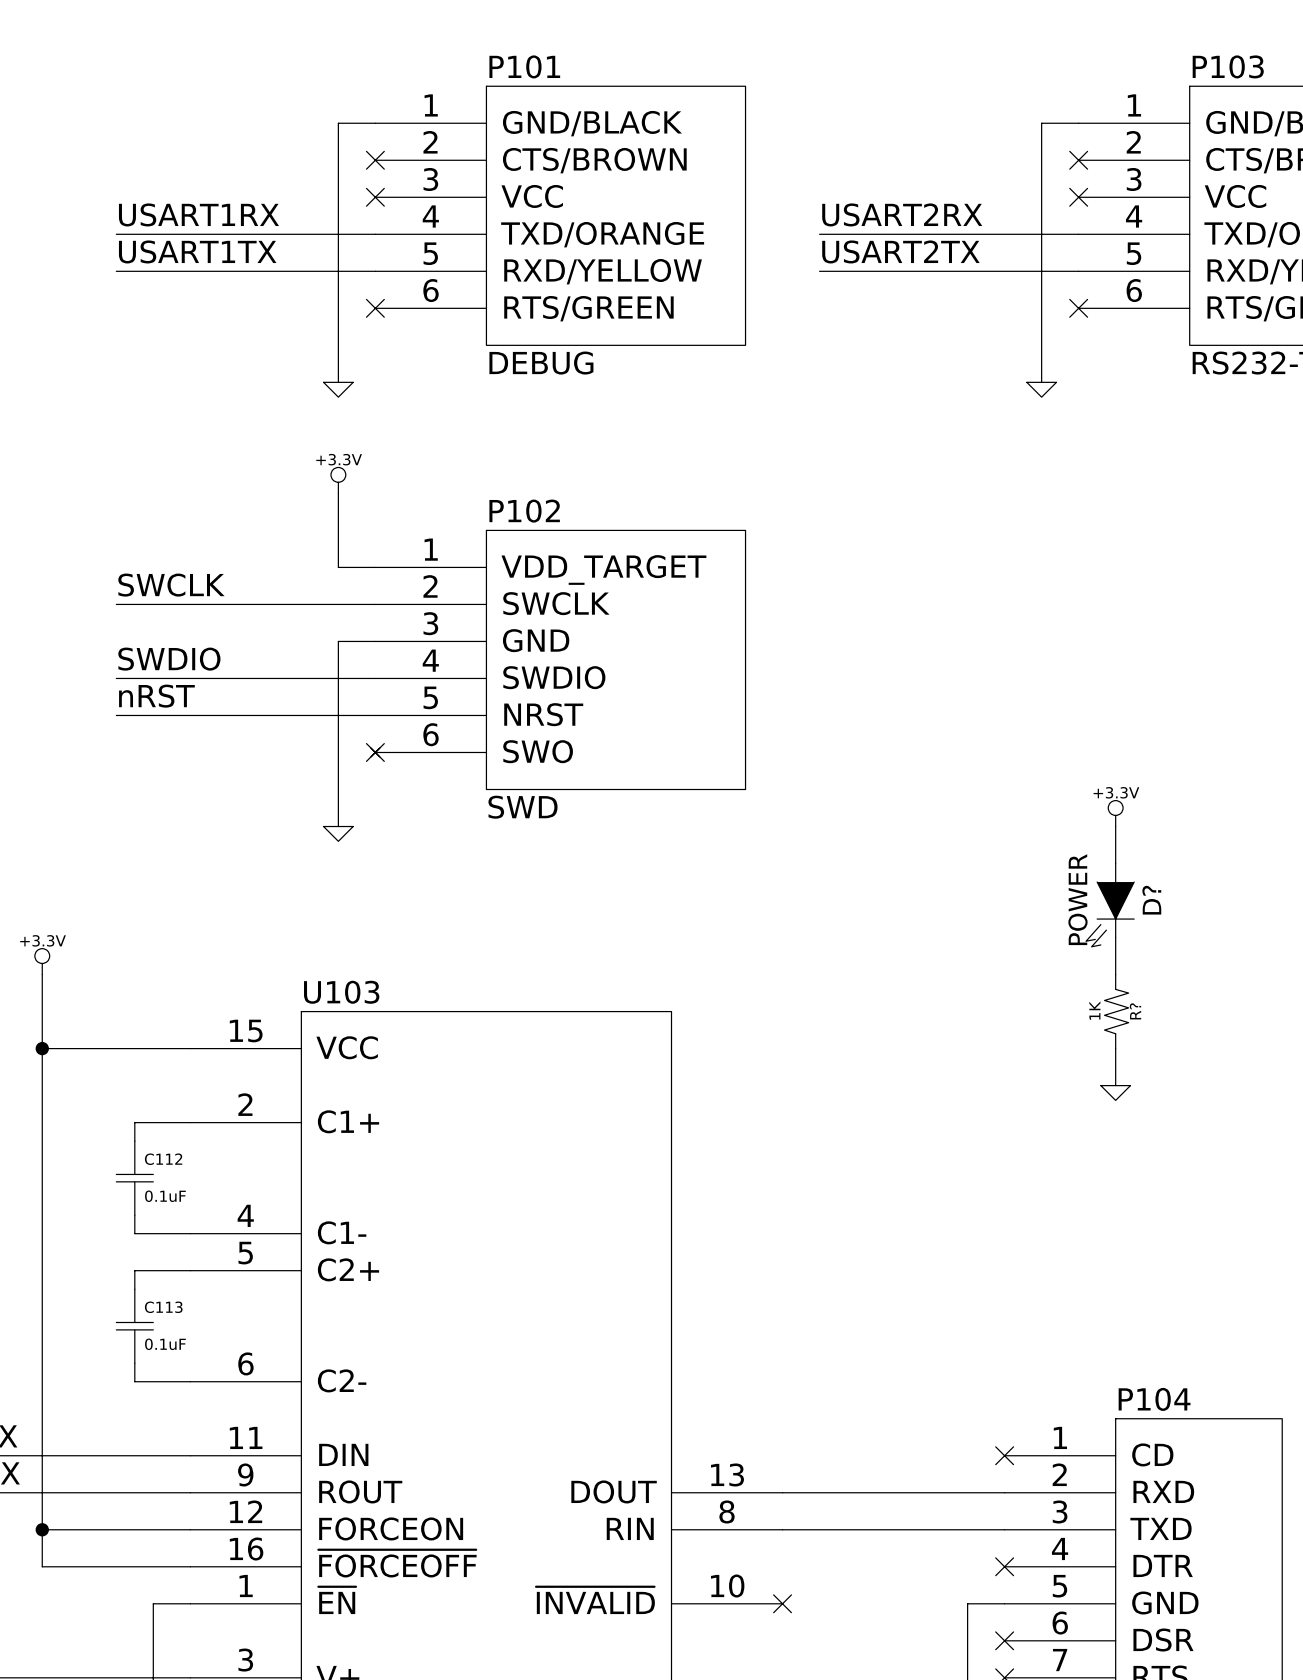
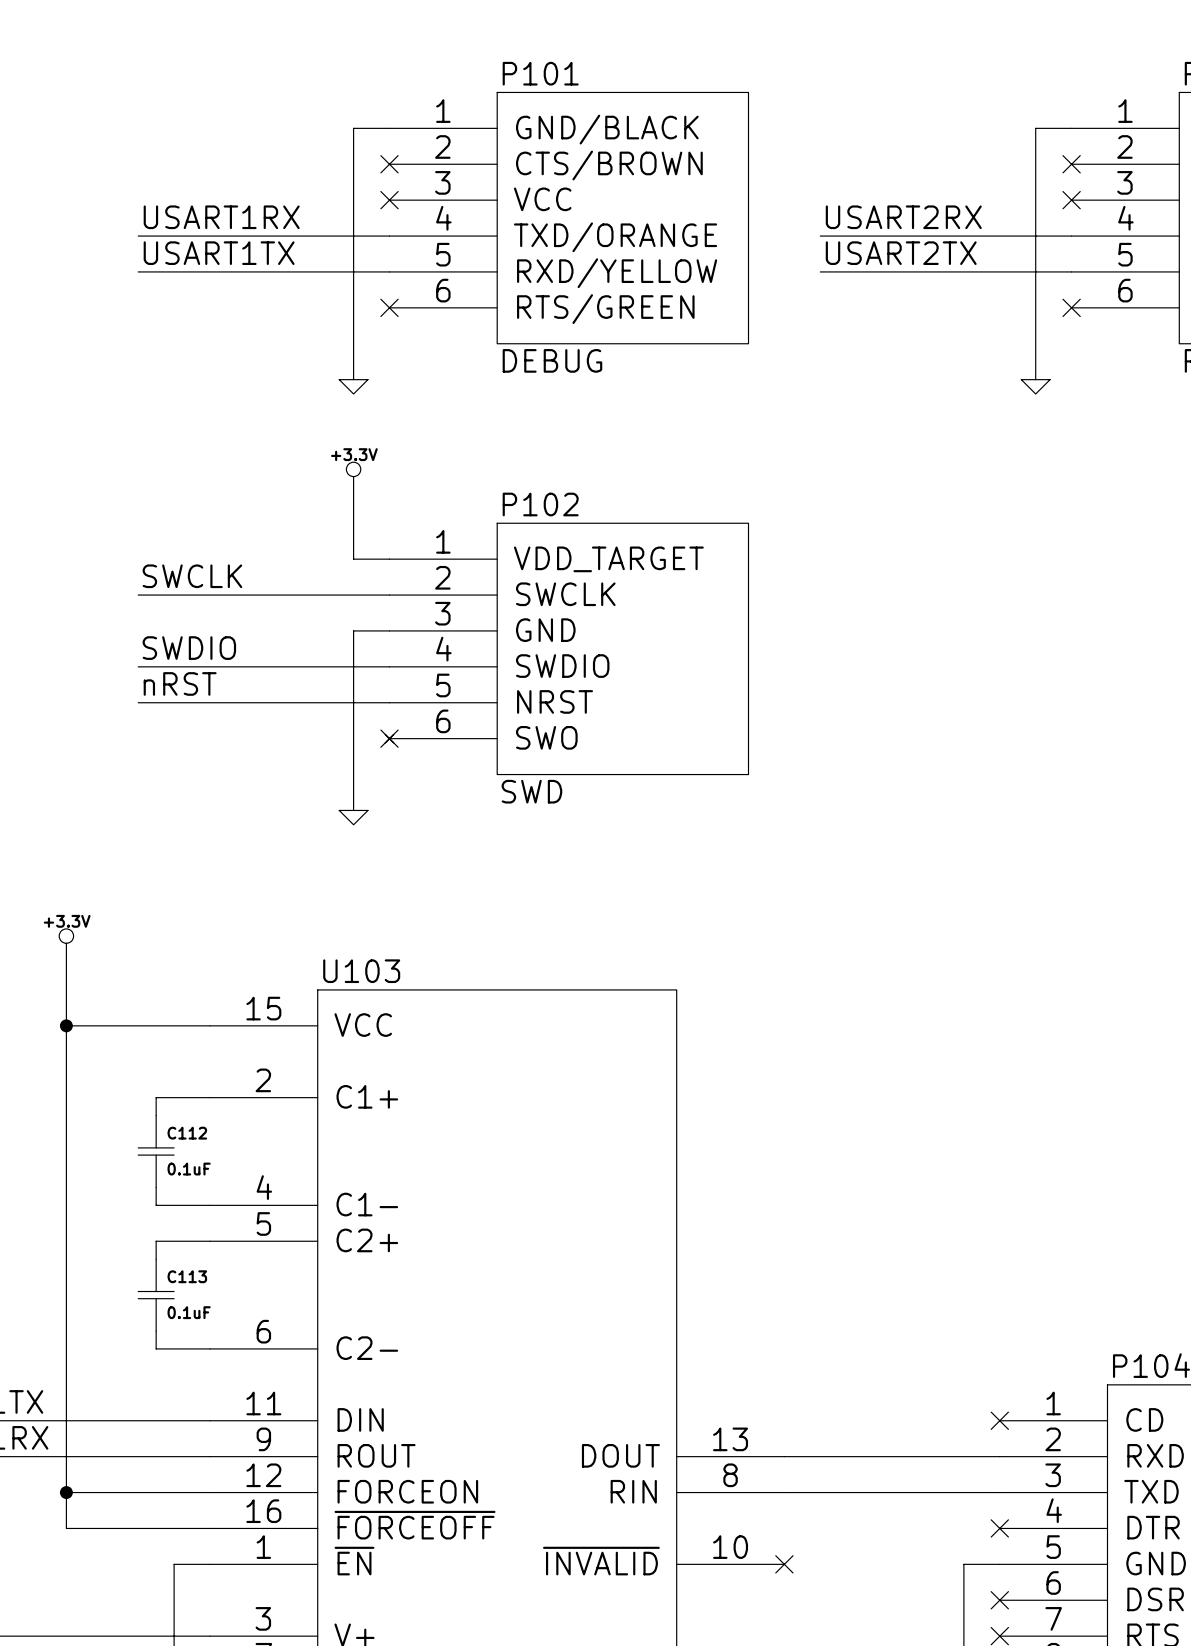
power symbol: +3.3V (1115, 813) -> none
wire: (1115, 826) (1115, 863) -> none
D?: POWER (1110, 905) -> none
wire: (1115, 937) (1115, 974) -> none
R?: 1K (1116, 1011) -> none
wire: (1115, 1048) (1115, 1085) -> none
power symbol: (1115, 1093) -> none

